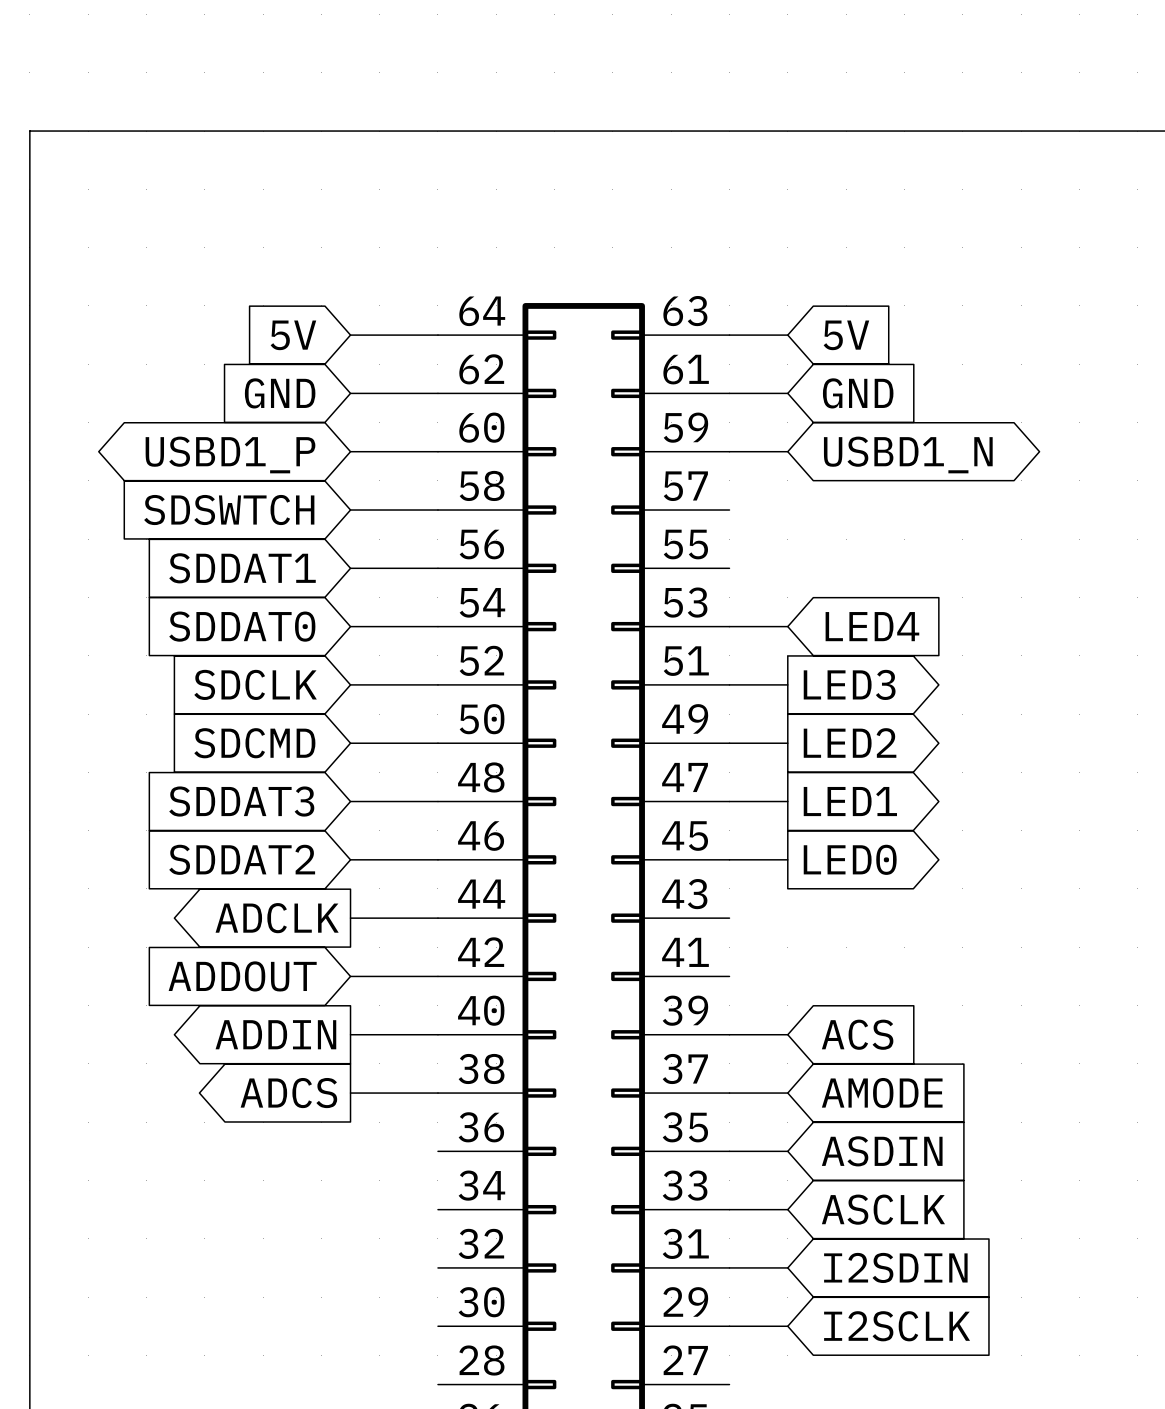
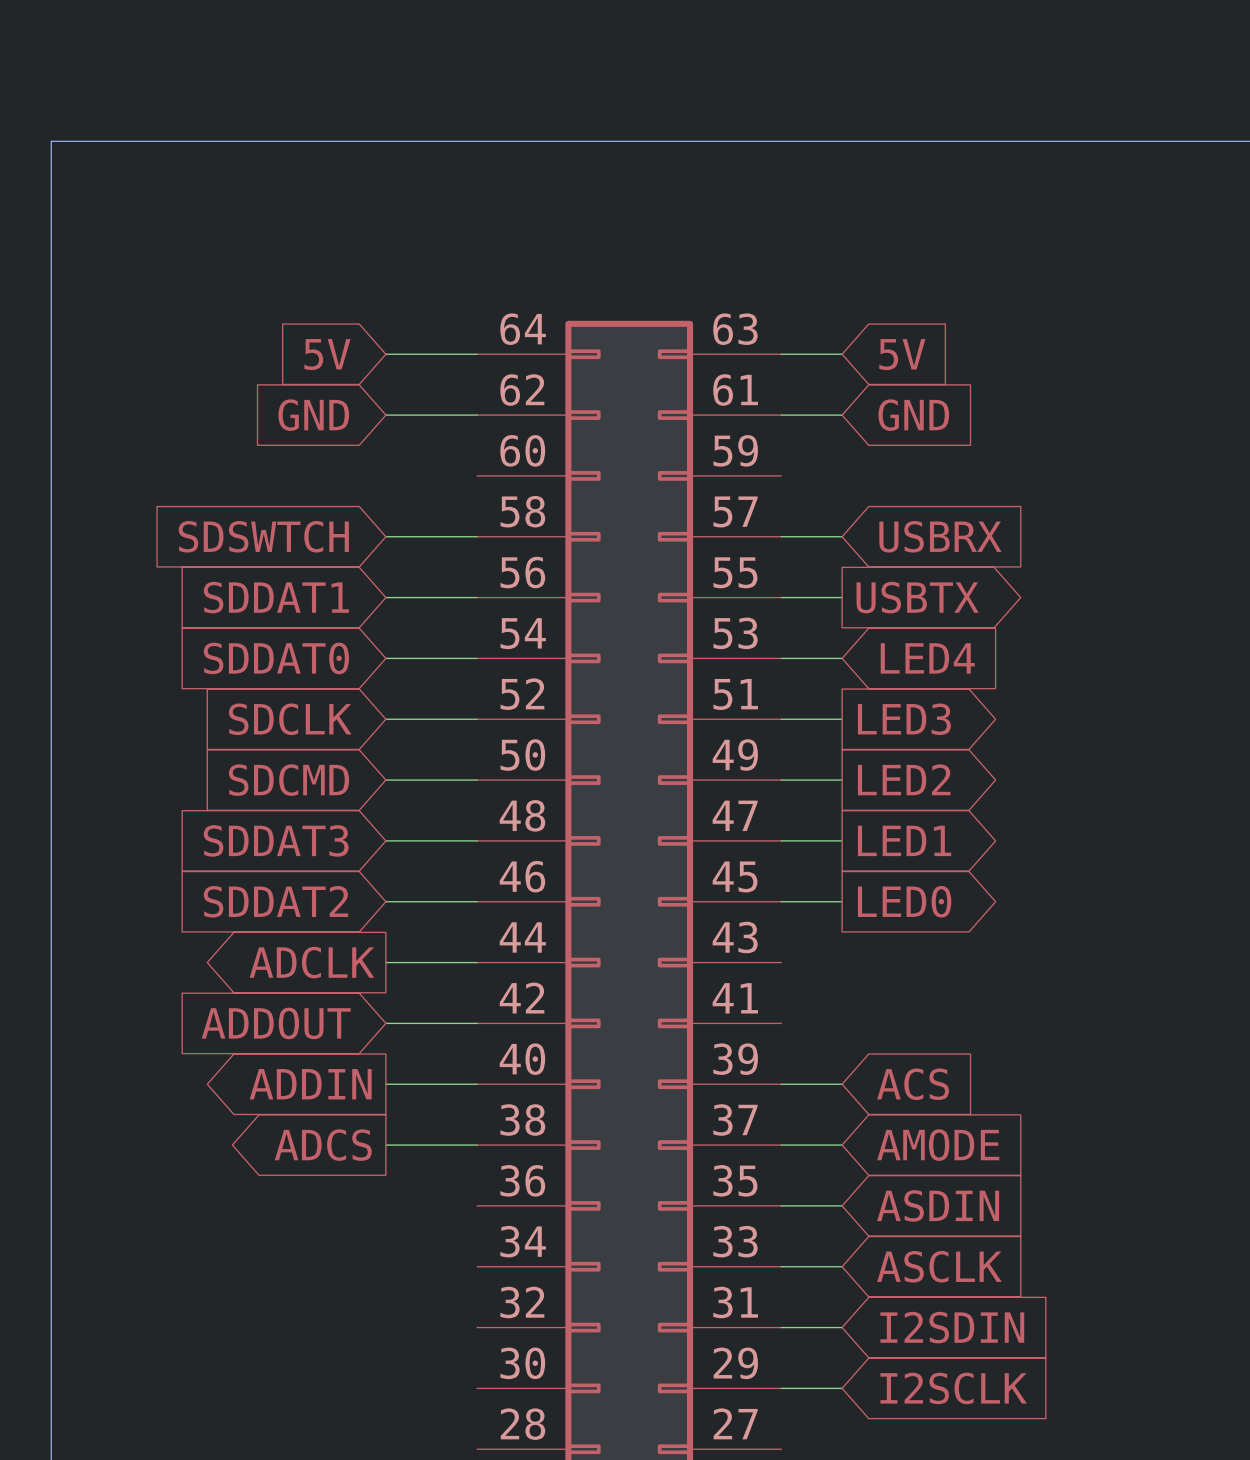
wire: (350, 451) (437, 451) -> none
wire: (729, 451) (787, 451) -> (781, 536) (842, 536)
global label: USBD1_P (230, 454) -> none
global label: USBD1_N (908, 454) -> none
global label: none -> USBRX (940, 536)
wire: none -> (781, 597) (842, 597)
global label: none -> USBTX (917, 597)

